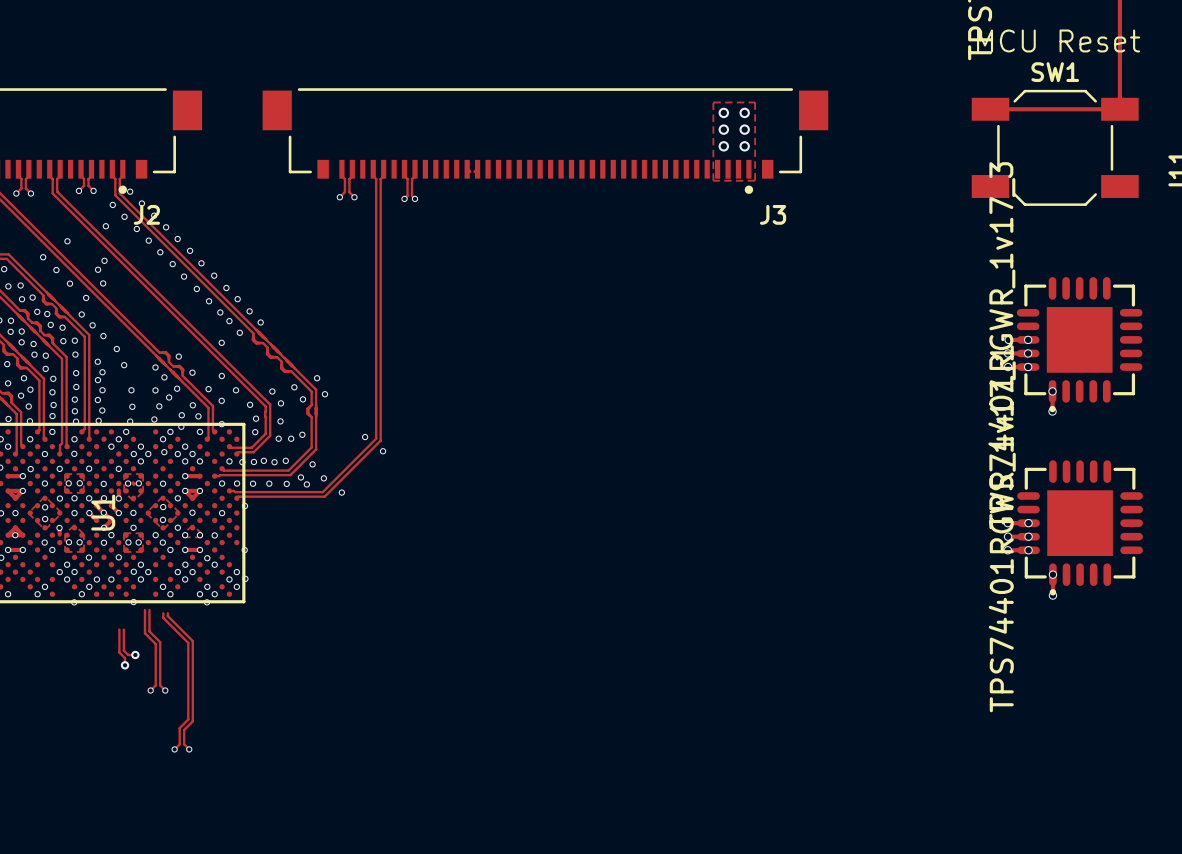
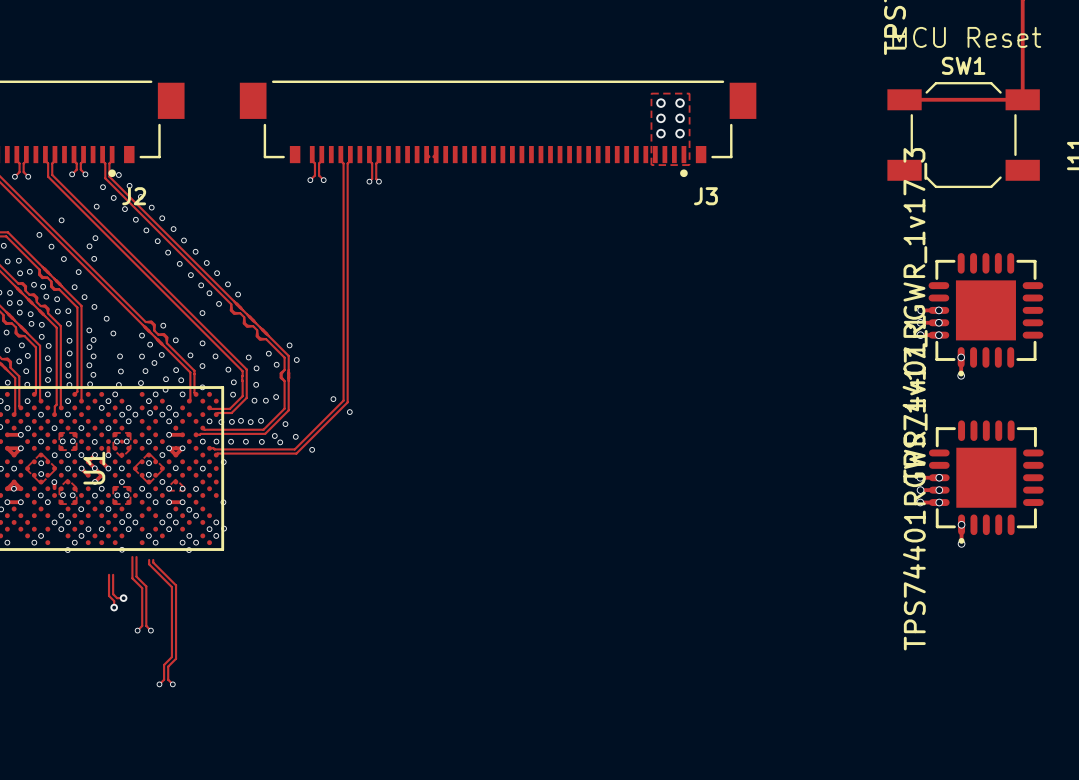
via: (199, 461) -> none

